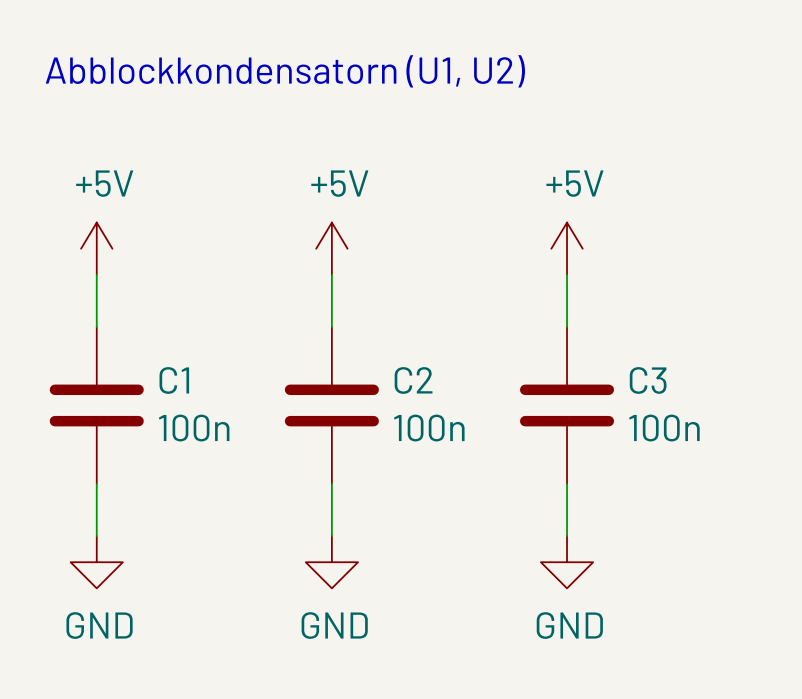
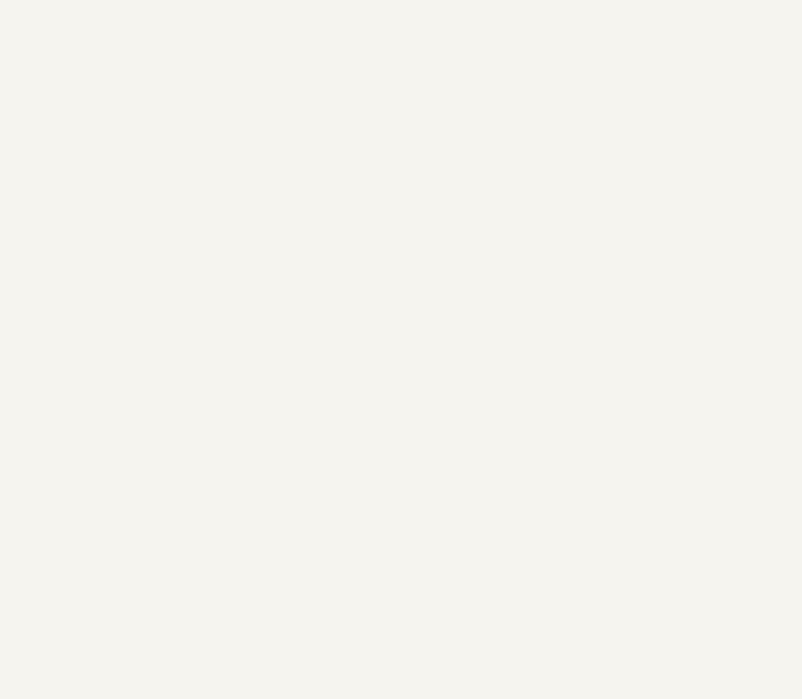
text: Abblockkondensatorn (U1, U2) (285, 71) -> none
power symbol: +5V (96, 248) -> none
power symbol: +5V (331, 248) -> none
power symbol: +5V (567, 248) -> none
wire: (96, 274) (96, 327) -> none
wire: (331, 274) (331, 327) -> none
wire: (567, 274) (567, 327) -> none
C1: 100n (96, 405) -> none
C2: 100n (331, 405) -> none
C3: 100n (567, 405) -> none
wire: (96, 483) (96, 536) -> none
wire: (331, 483) (331, 536) -> none
wire: (567, 483) (567, 536) -> none
power symbol: GND (96, 562) -> none
power symbol: GND (331, 562) -> none
power symbol: GND (567, 562) -> none

